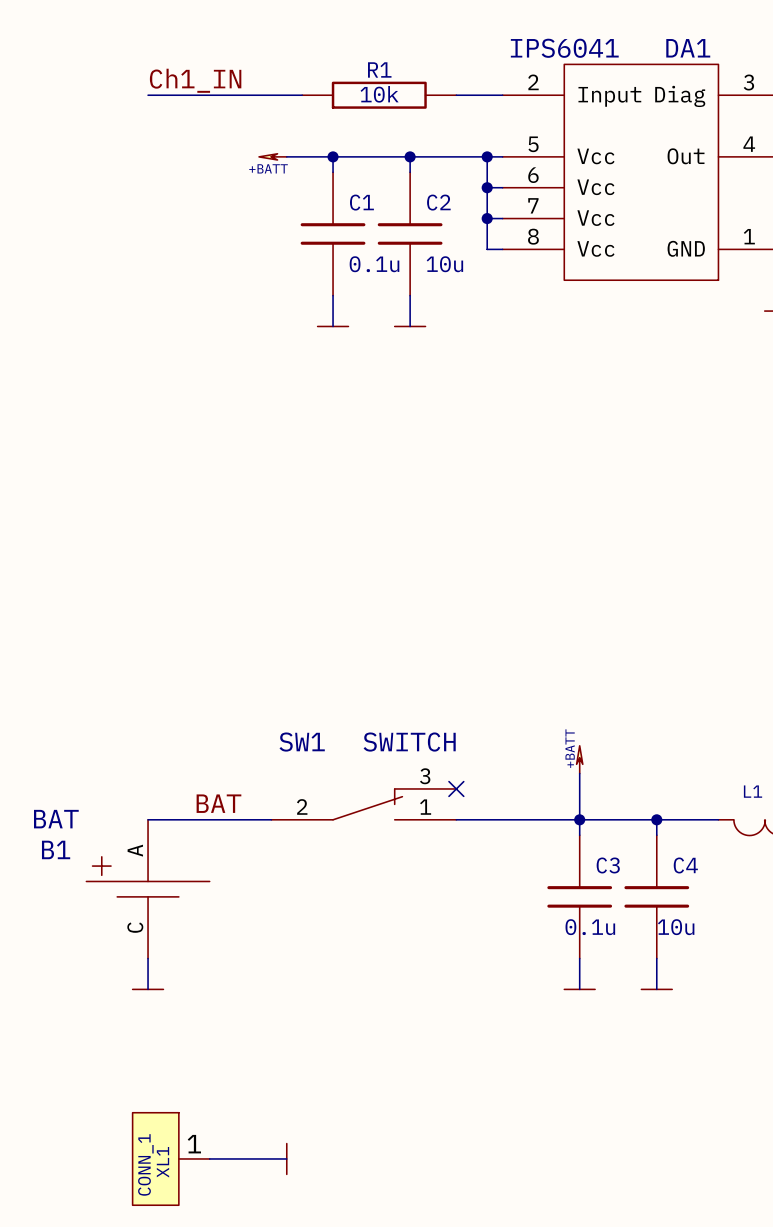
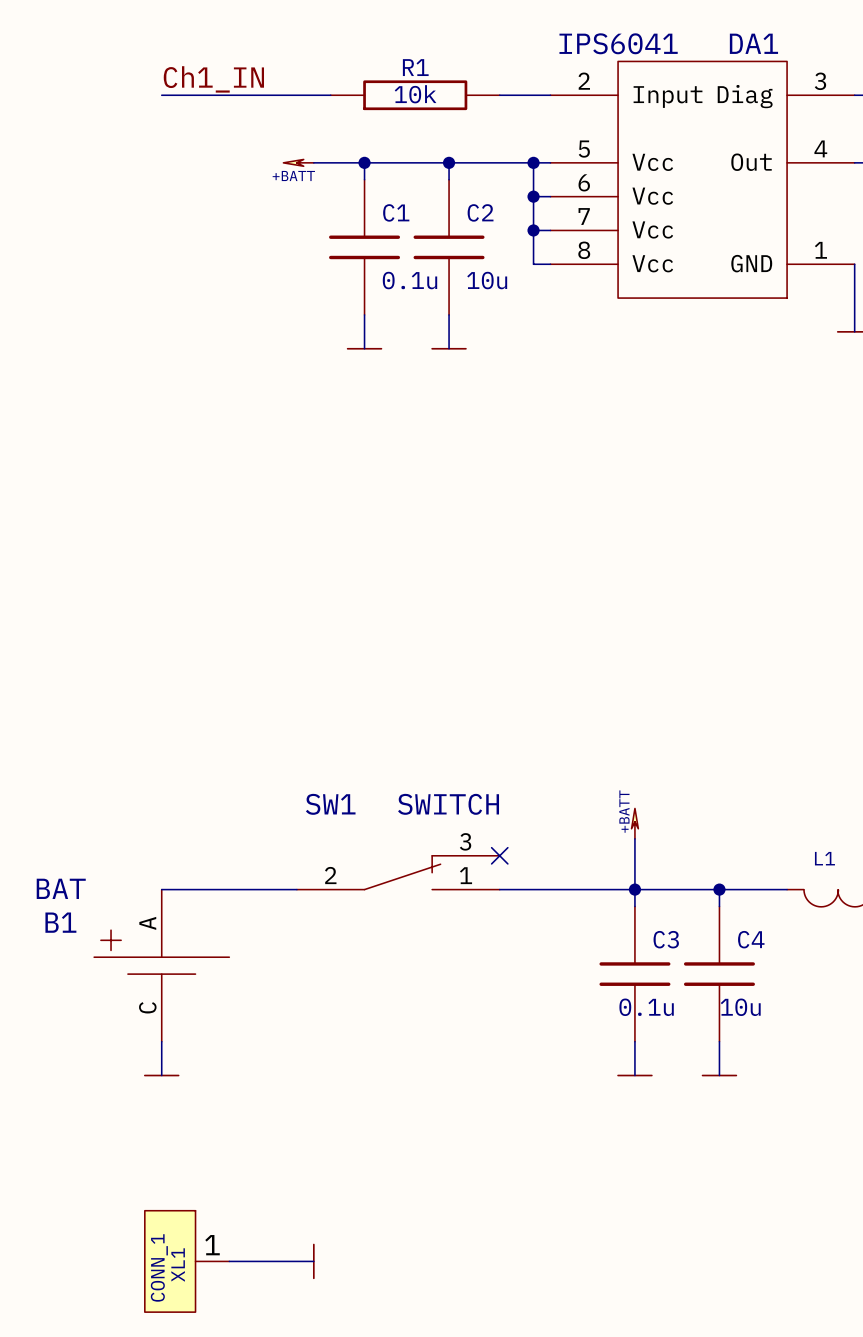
label: BAT (218, 803) -> none

